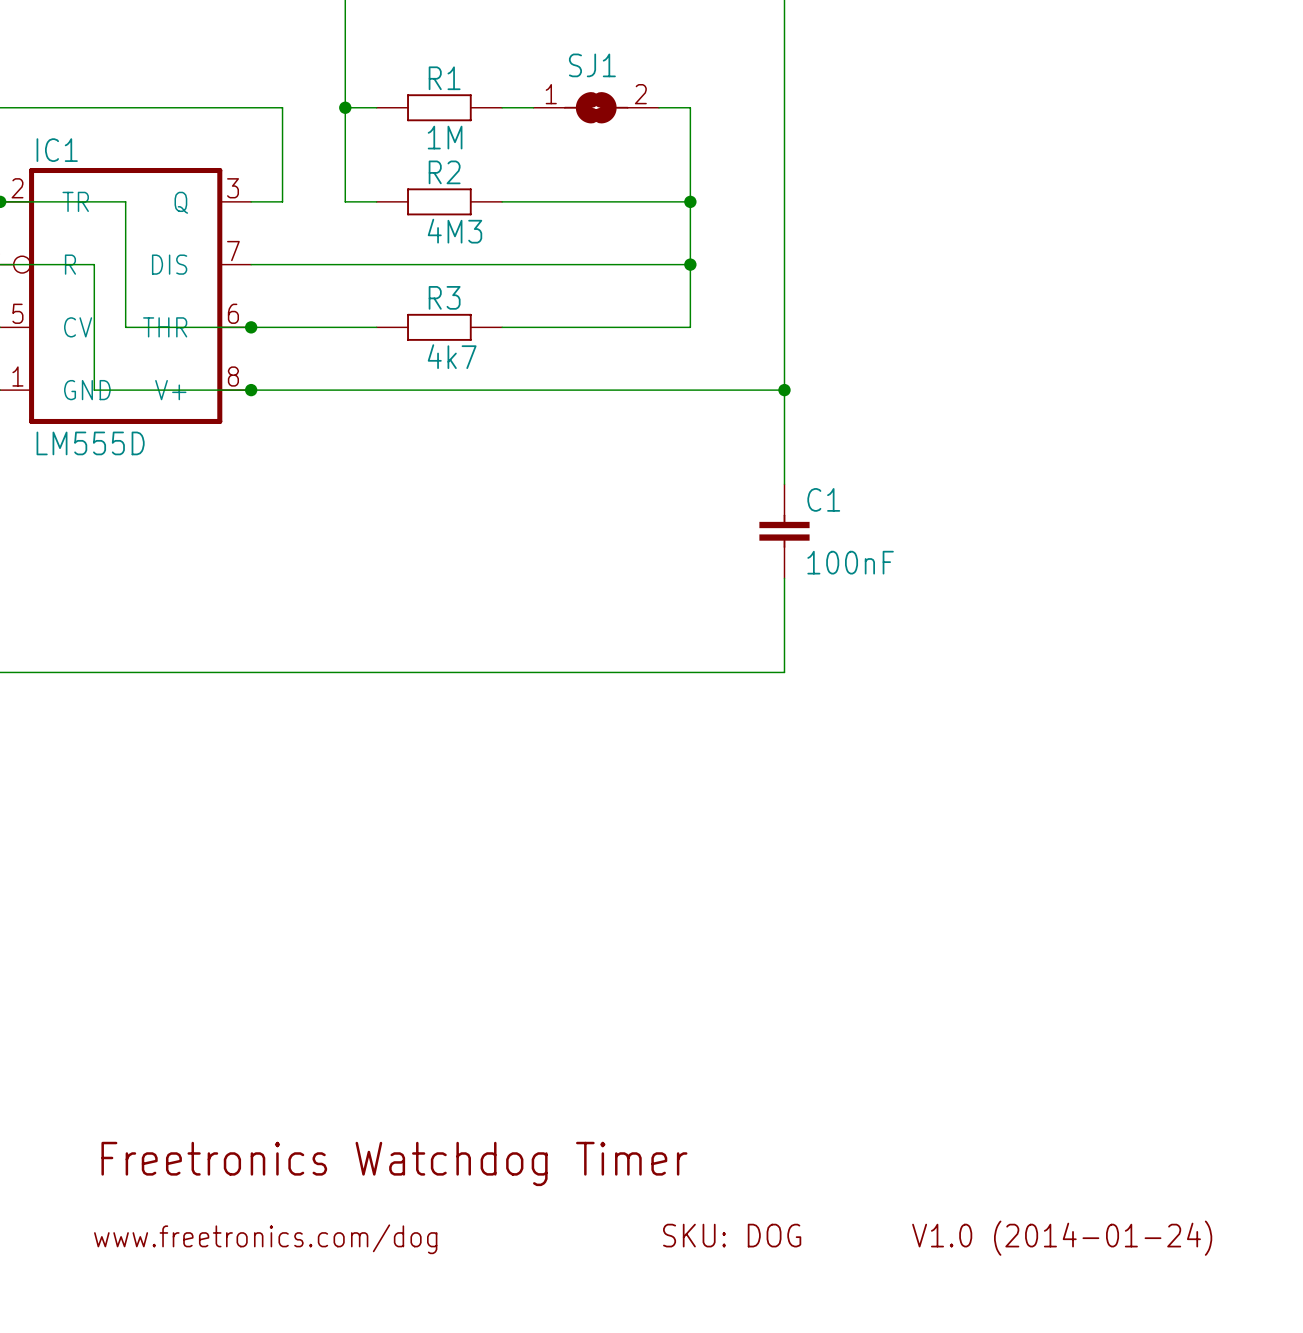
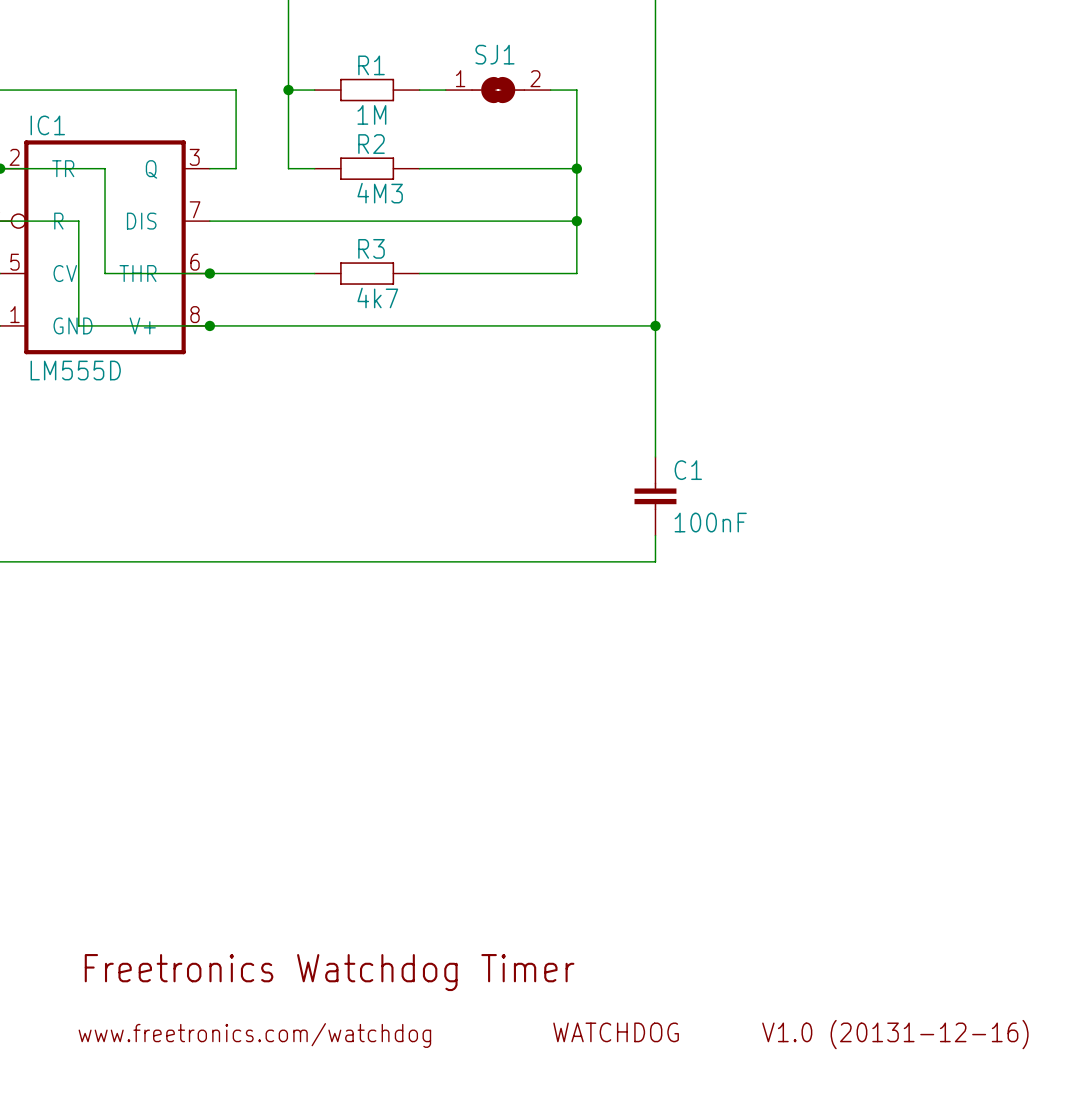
C1 position: (784, 531) -> (655, 496)
text: SKU: DOG (732, 1235) -> WATCHDOG (616, 1032)
text: V1.0 (2014-01-24) (1062, 1238) -> V1.0 (20131-12-16) (895, 1034)
text: www.freetronics.com/dog (265, 1239) -> www.freetronics.com/watchdog (254, 1035)

